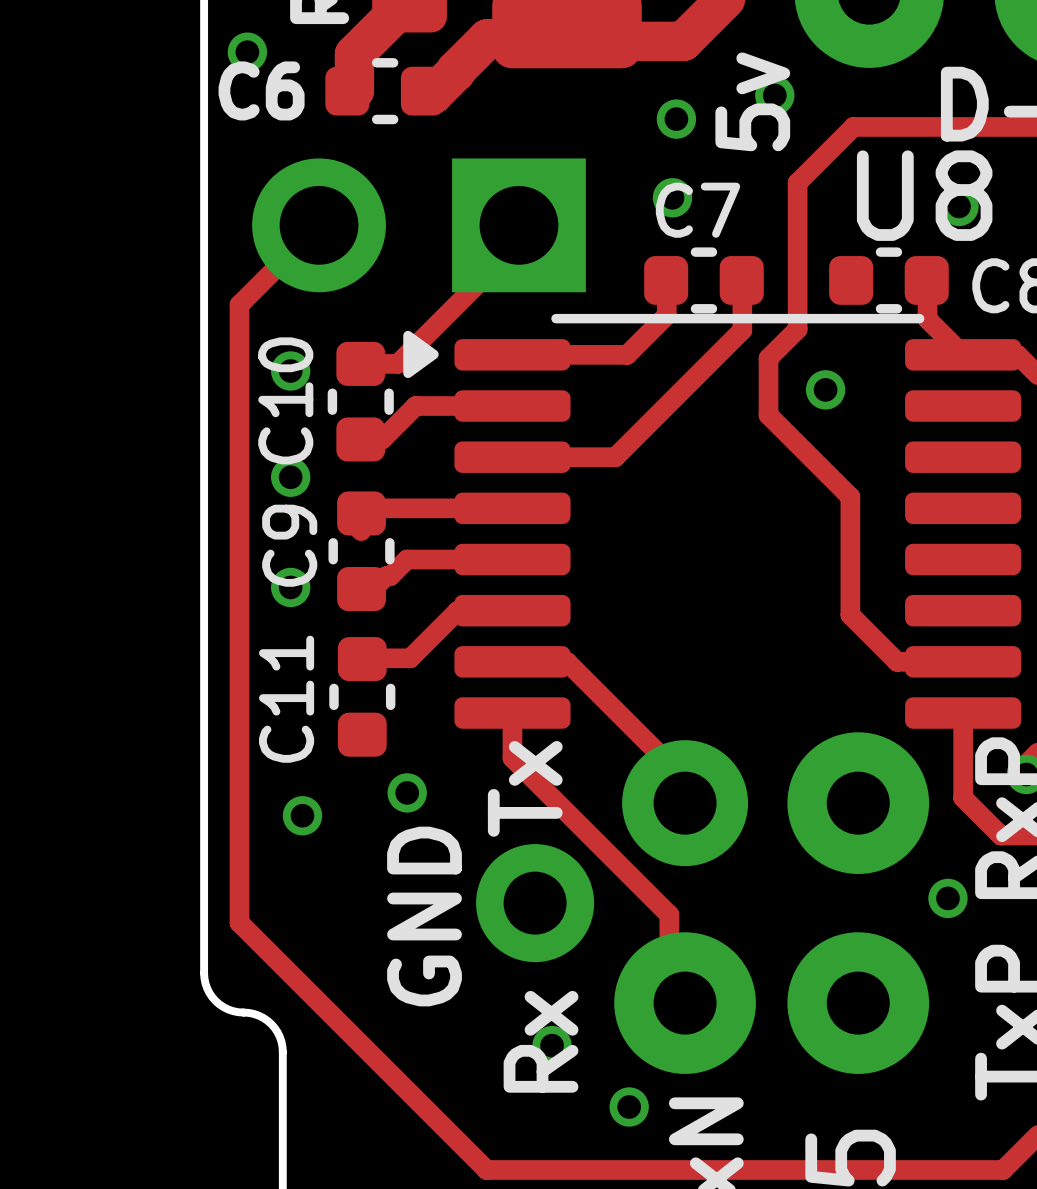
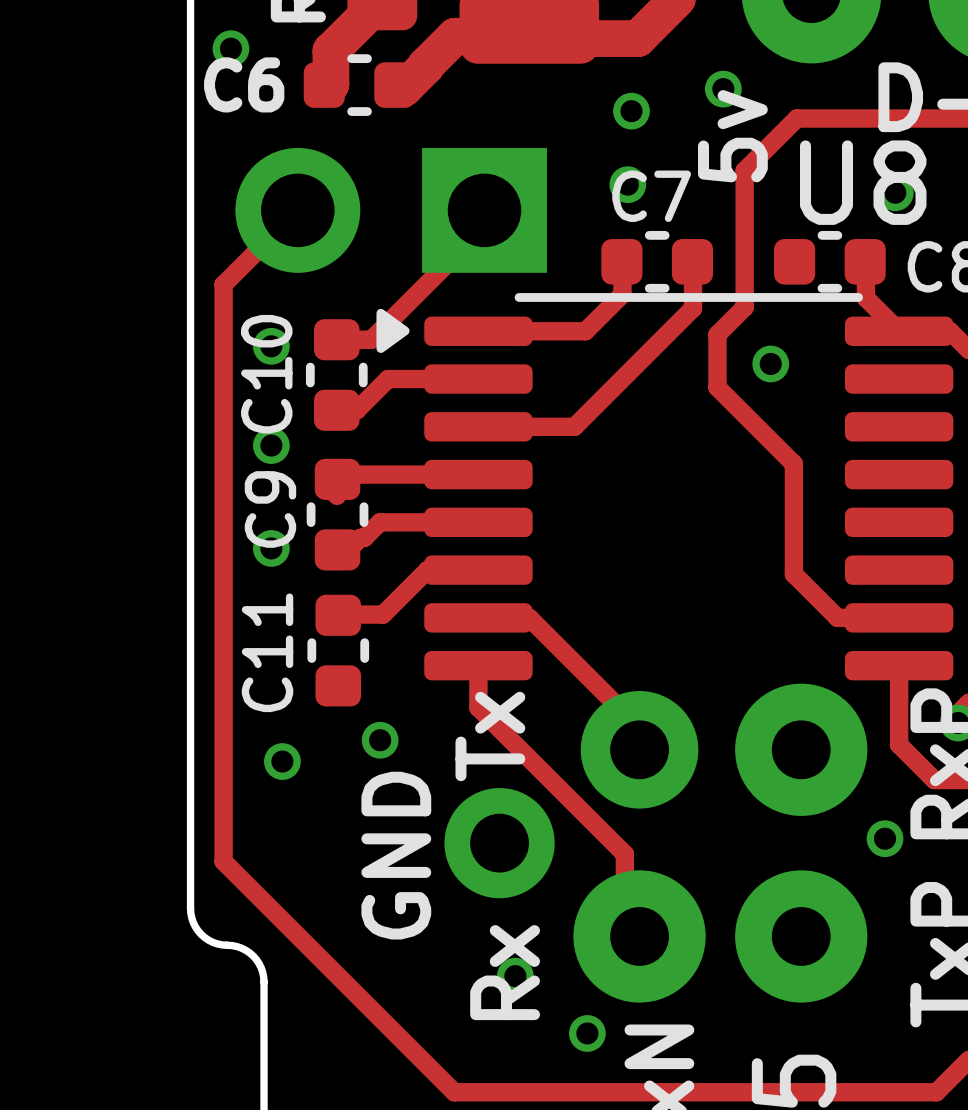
part text position: 5v (752, 101) -> 5v (732, 136)

